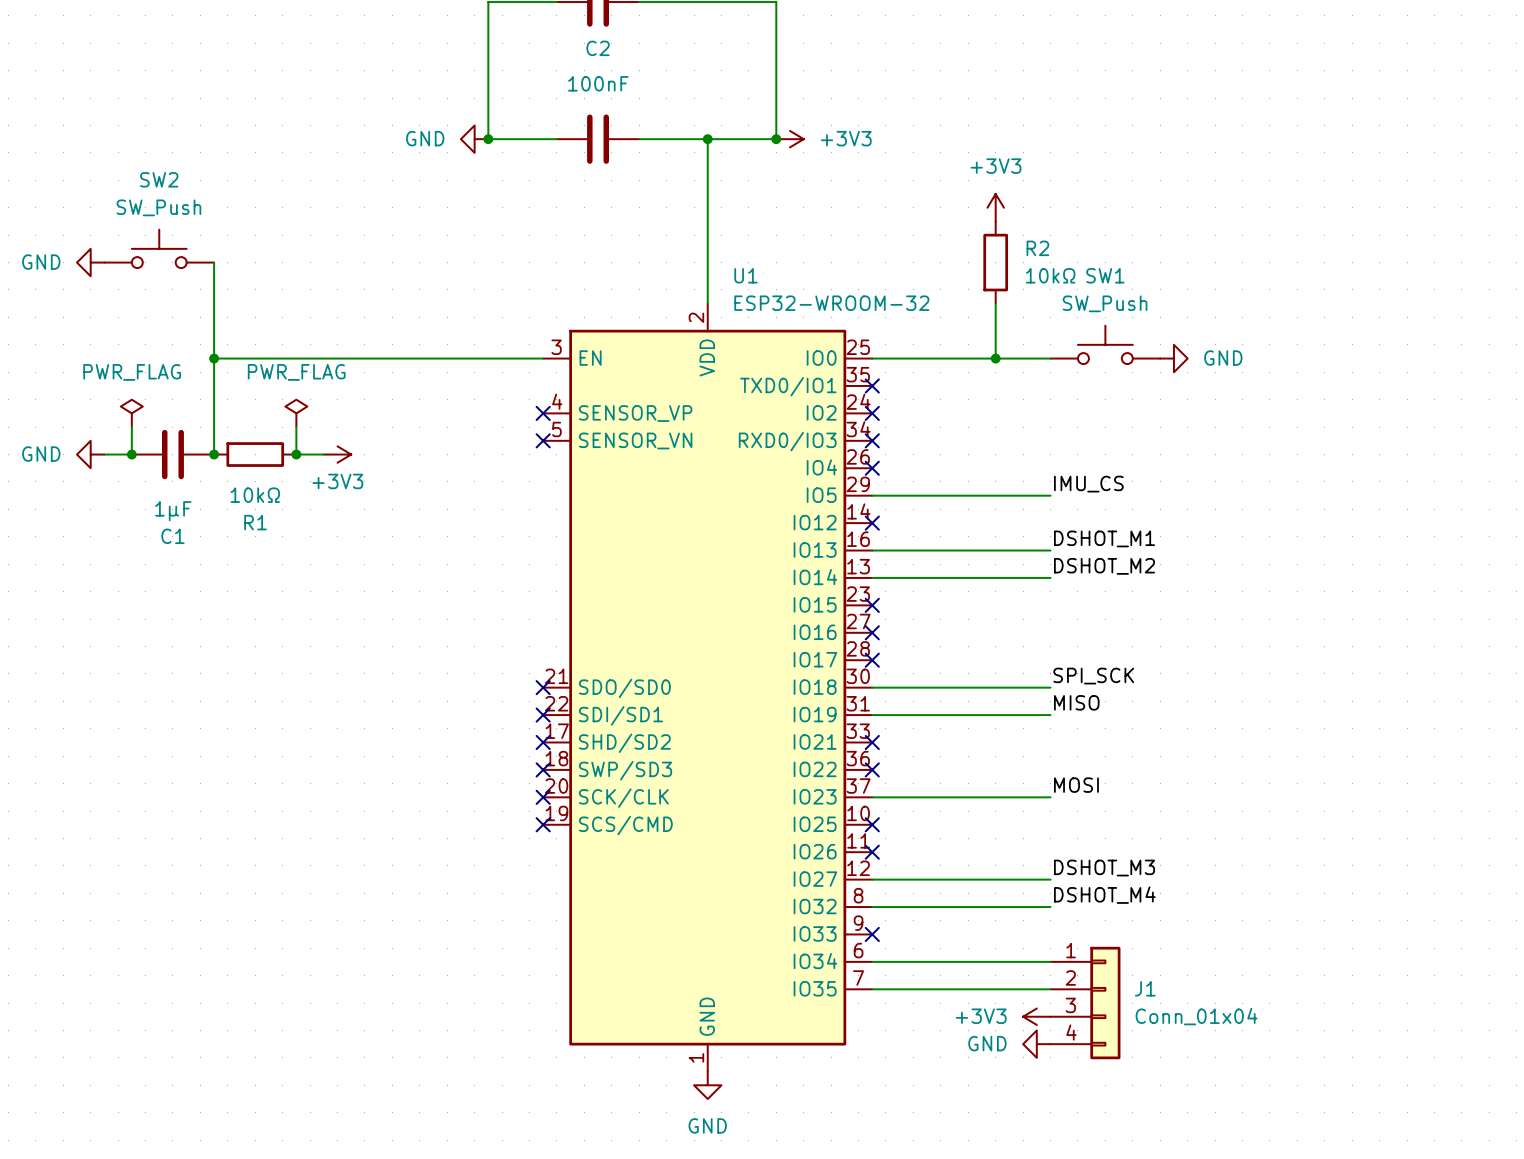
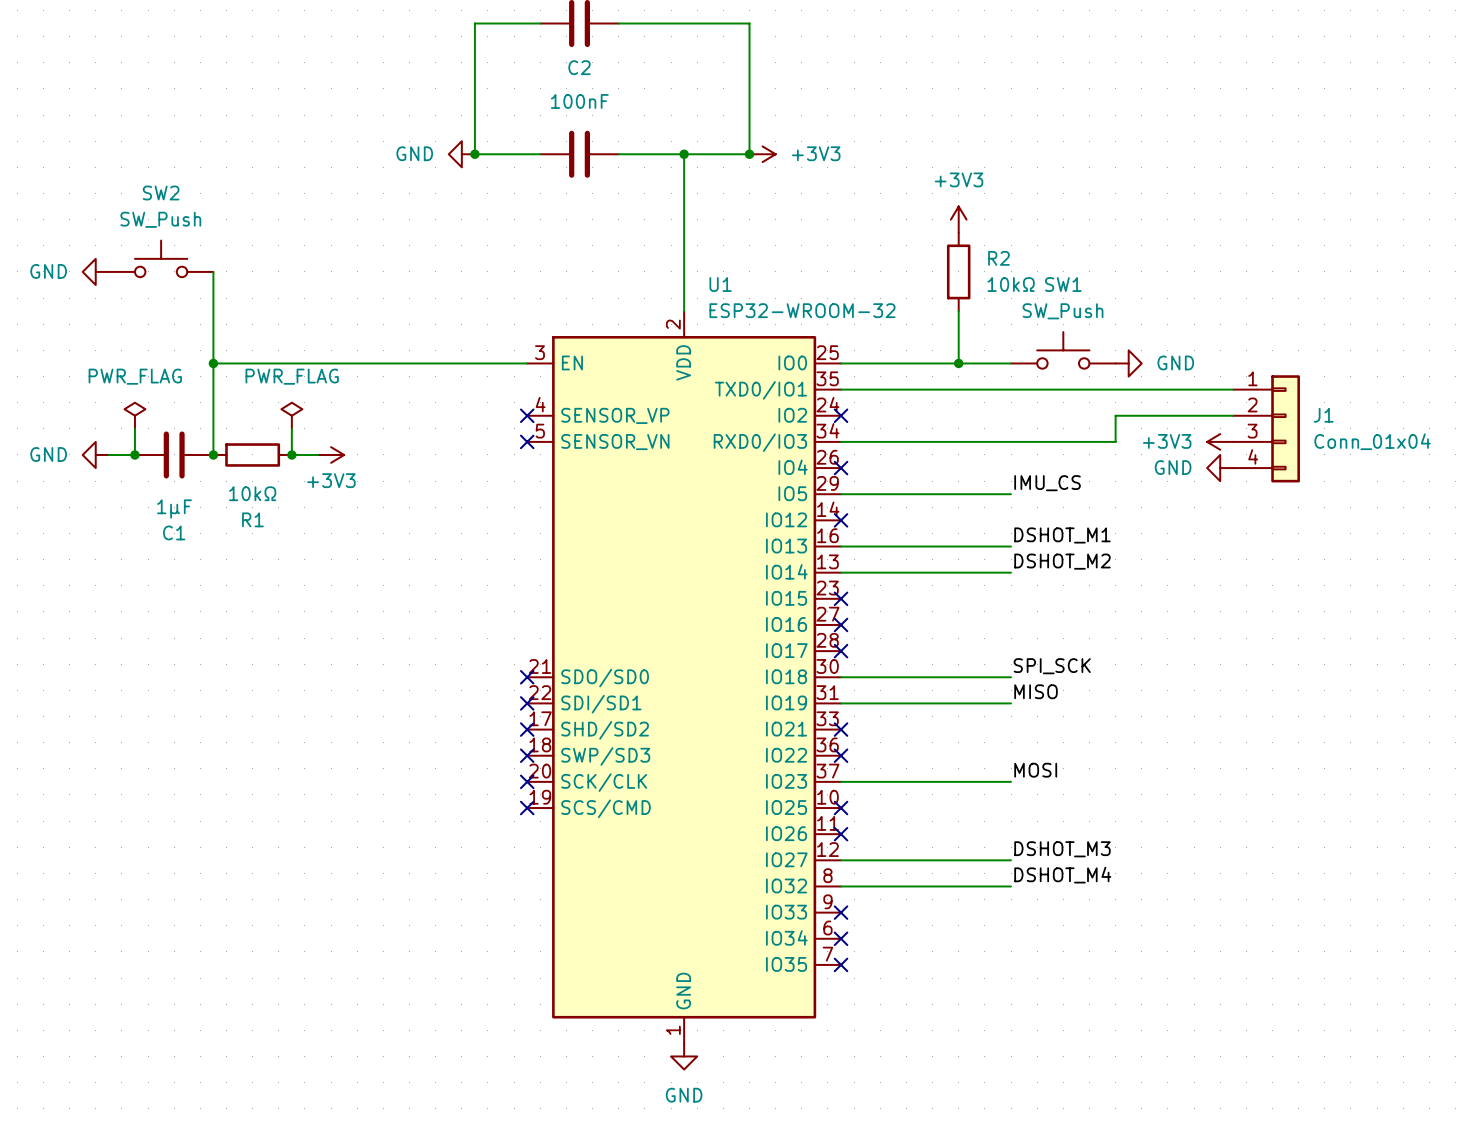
wire: none -> (841, 389) (1233, 389)
no-connect mark: (872, 385) -> none
wire: none -> (1233, 415) (1115, 415) (1115, 441) (841, 441)
no-connect mark: (872, 440) -> none
power symbol: none -> +3V3 (1220, 441)
power symbol: none -> GND (1220, 468)
wire: (872, 961) (1050, 961) -> none
no-connect mark: none -> (841, 938)
wire: (872, 989) (1050, 989) -> none
no-connect mark: none -> (841, 964)
J1 position: (1085, 1003) -> (1266, 428)
power symbol: +3V3 (1036, 1016) -> none
power symbol: GND (1036, 1044) -> none

